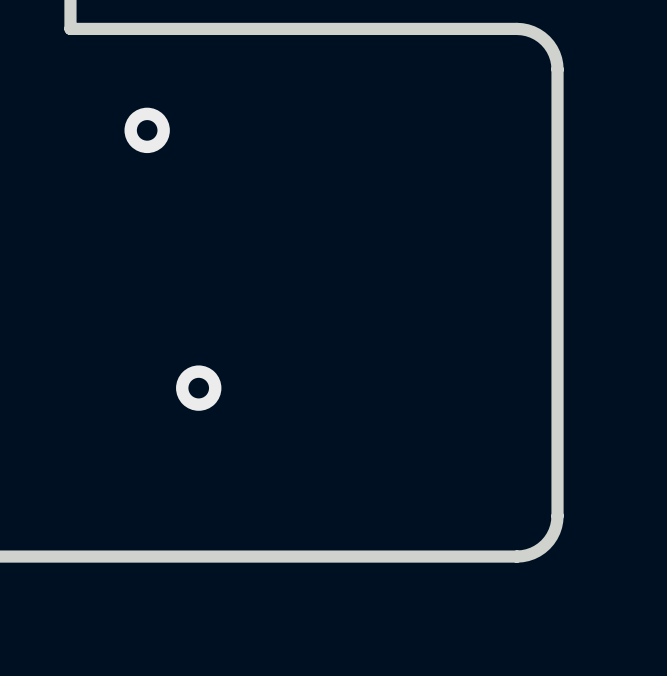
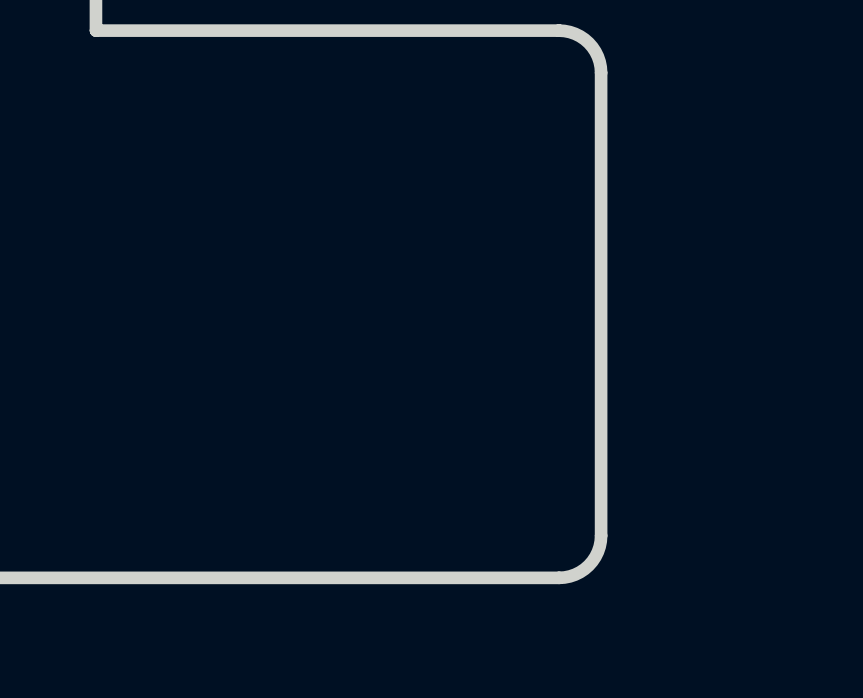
via: (147, 130) -> none
via: (198, 388) -> none

